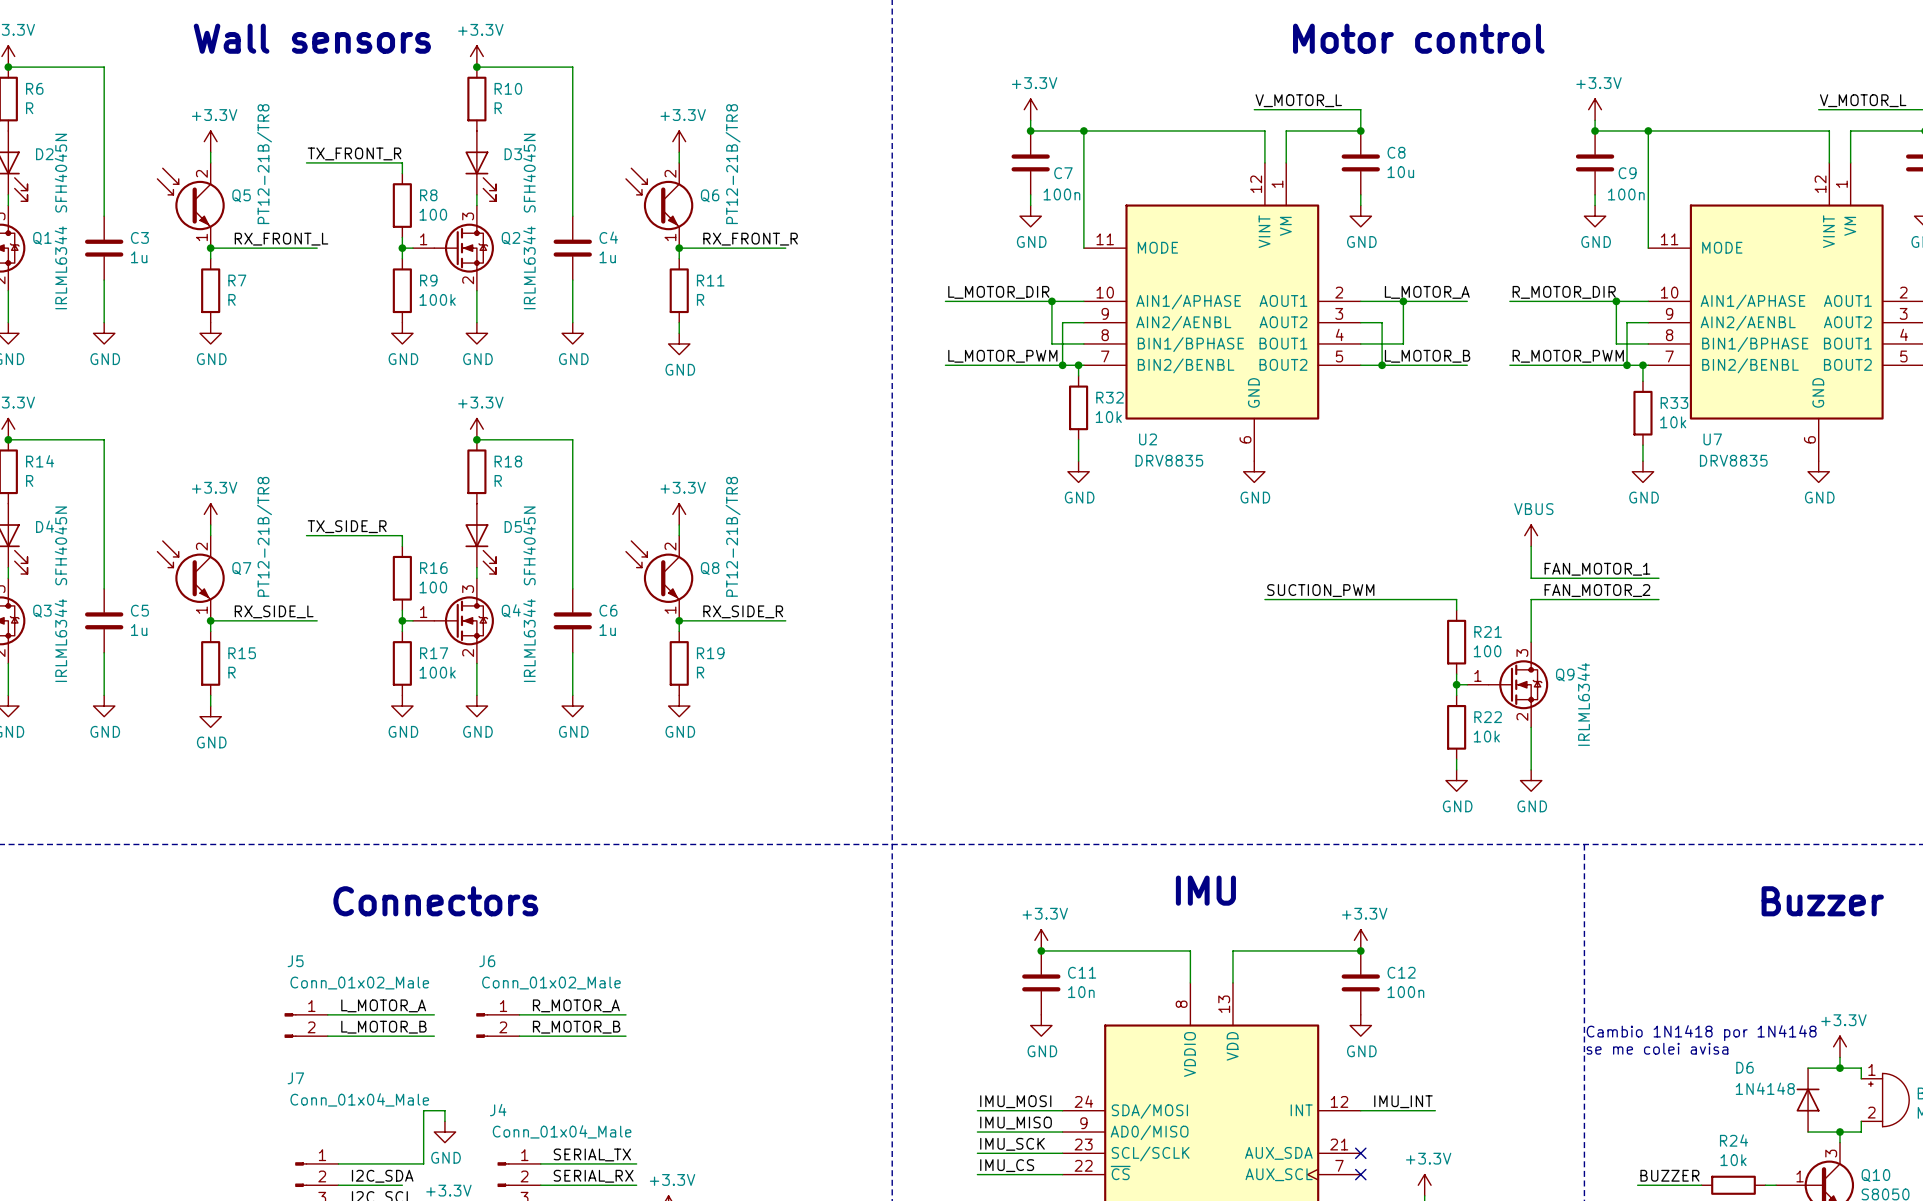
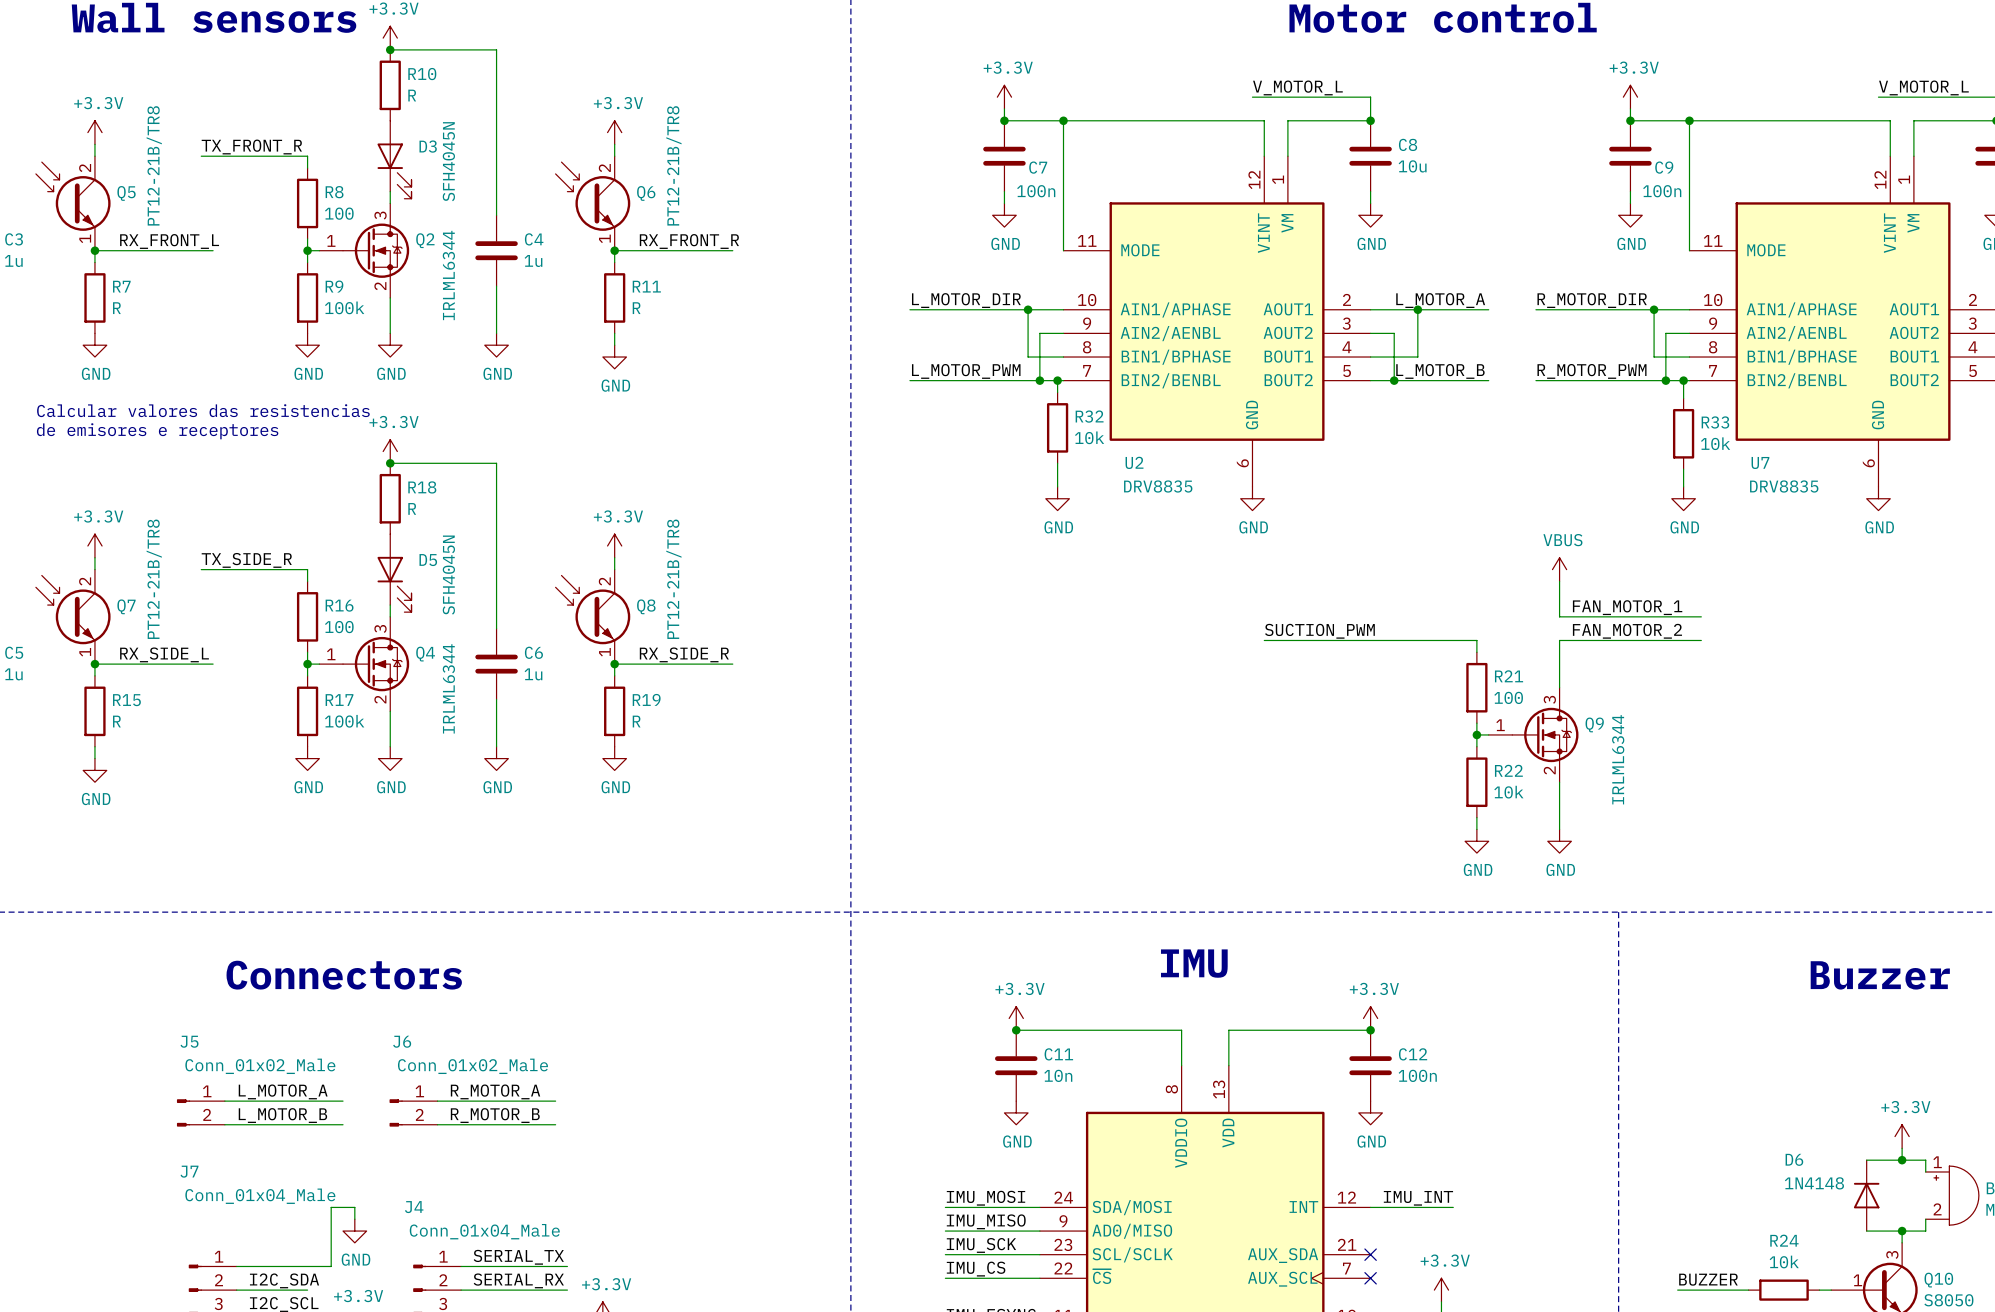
text: none -> Calcular valores das resistencias (203, 410)
text: none -> de emisores e receptores (157, 431)
text: Cambio 1N1418 por 1N4148 (1701, 1033) -> none
text: se me colei avisa (1657, 1048) -> none

